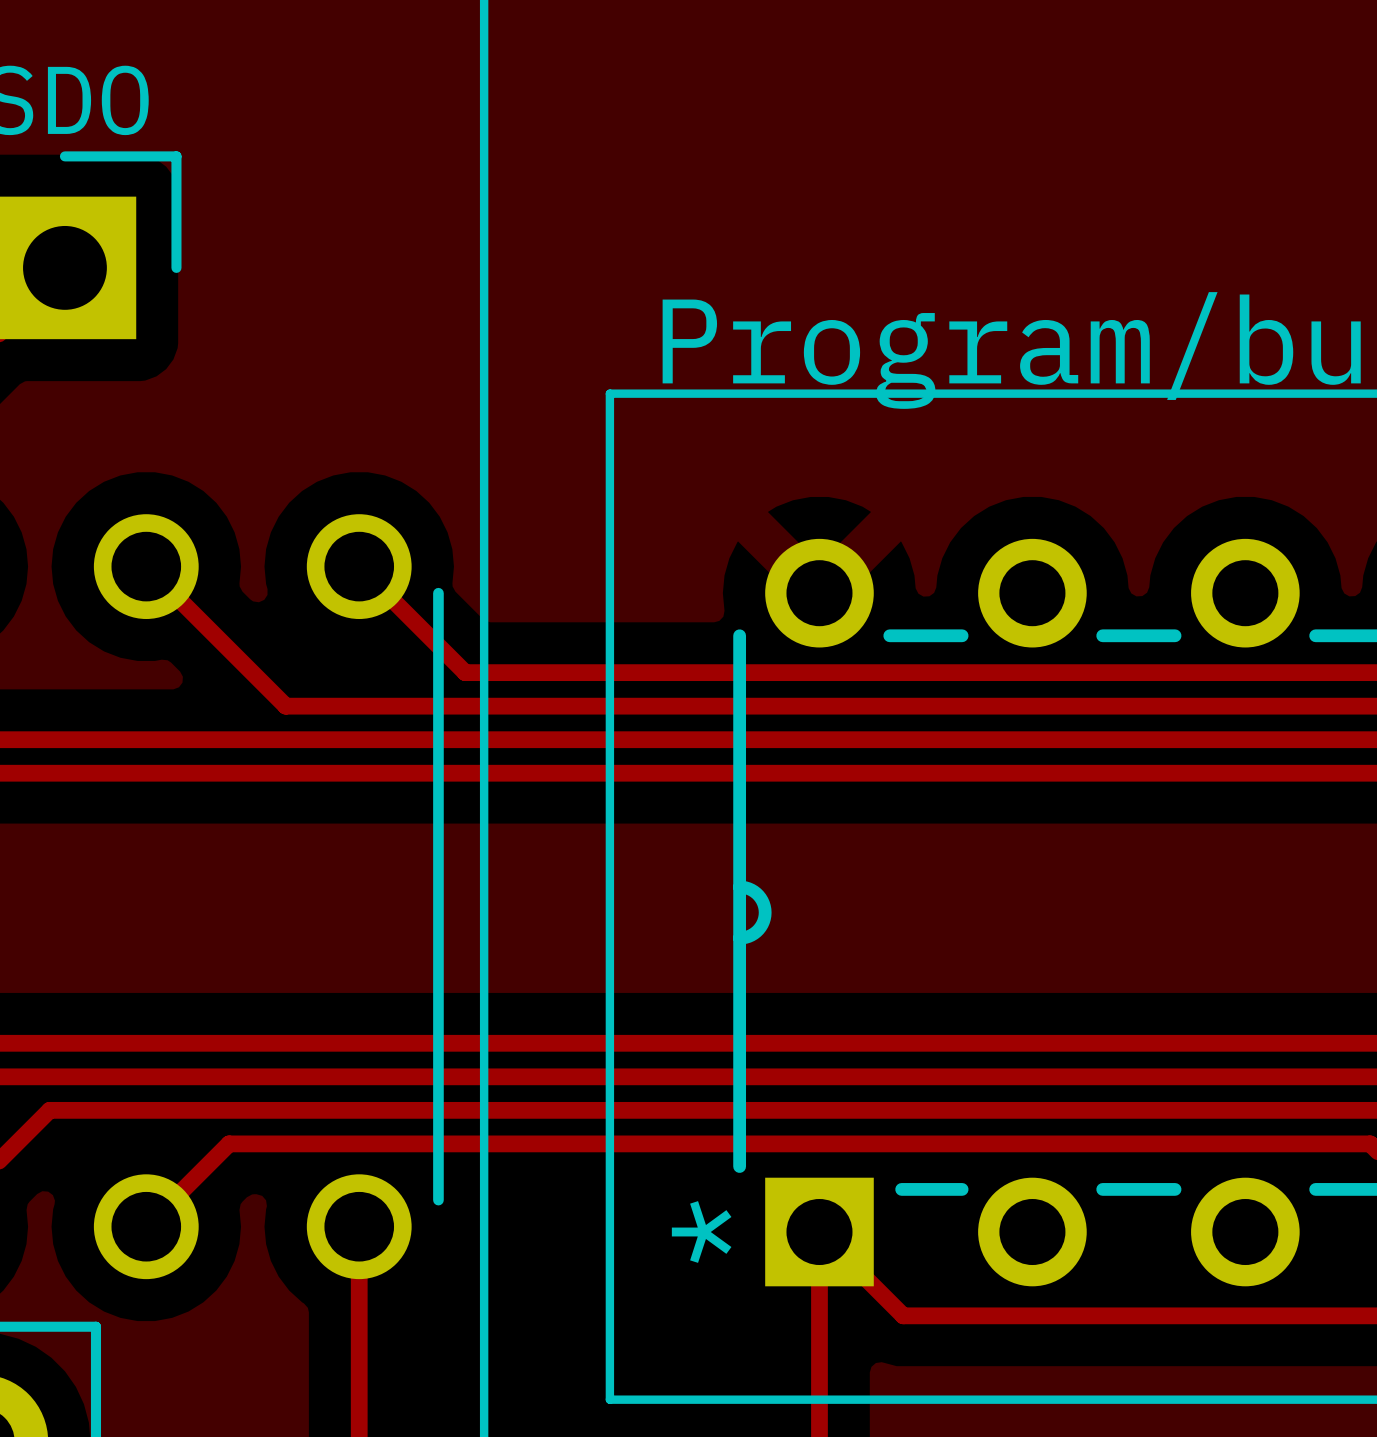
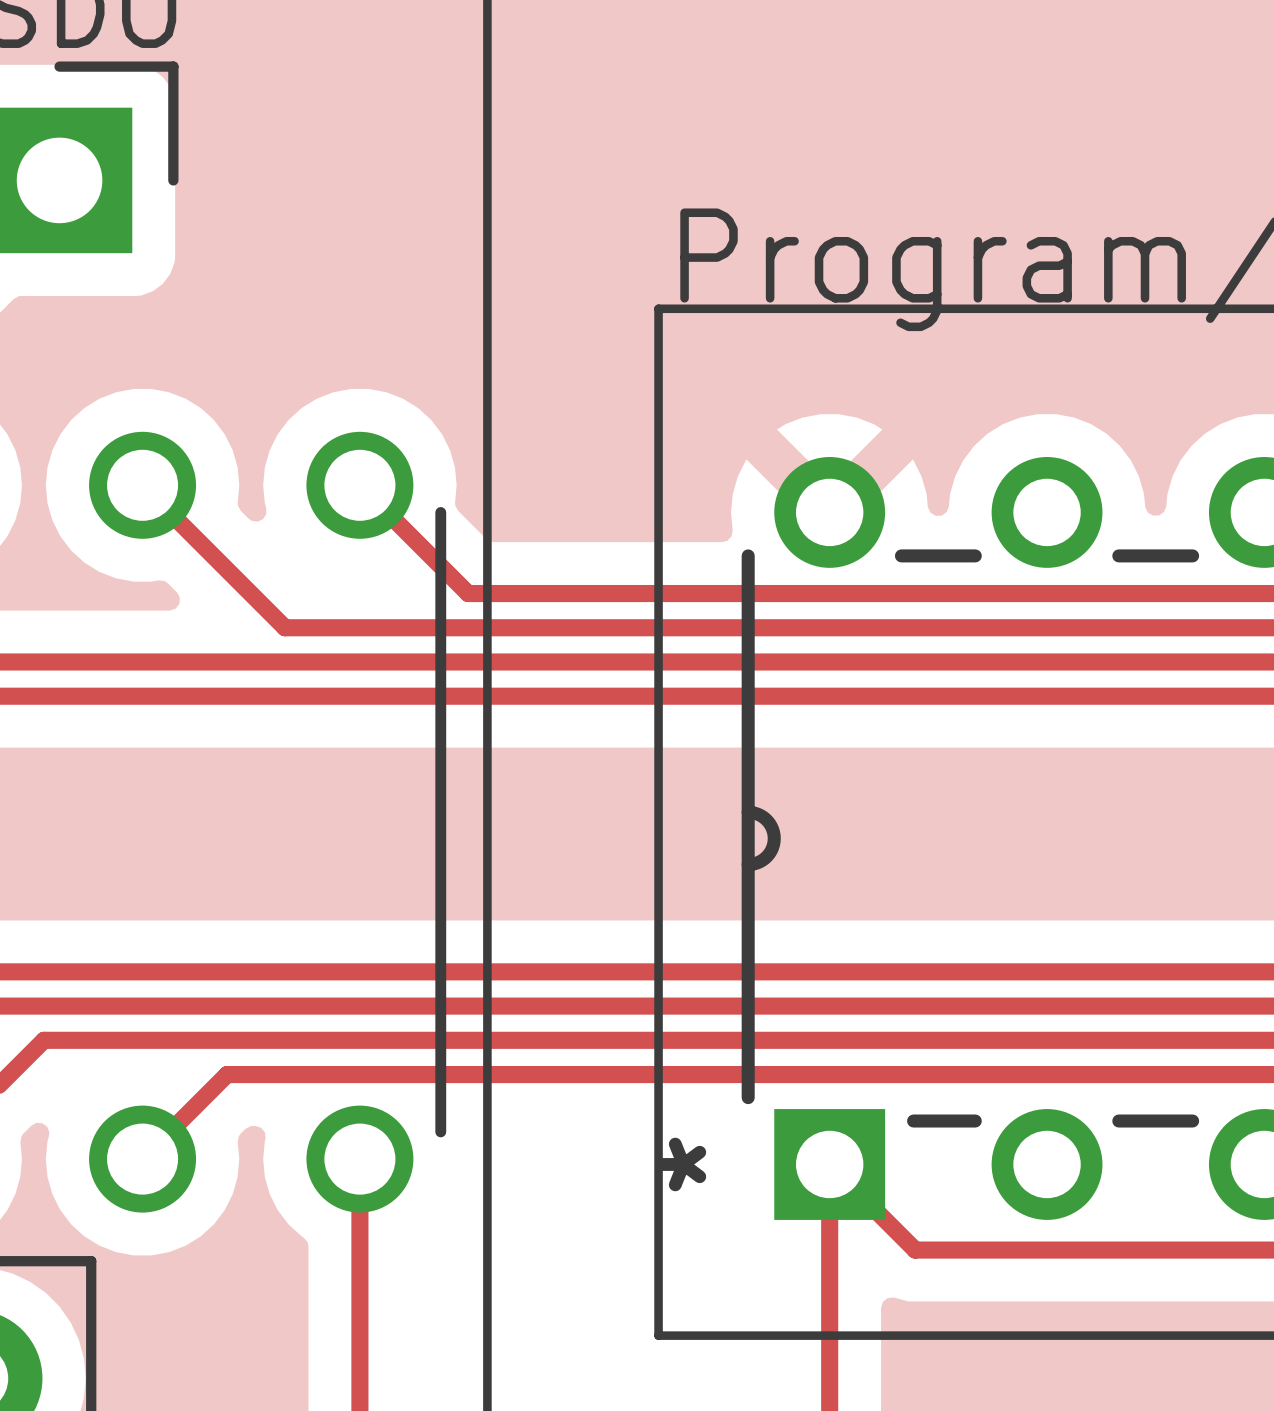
line: (651, 393) (609, 393) (609, 1399) (651, 1399) -> (658, 308) (658, 1335)

